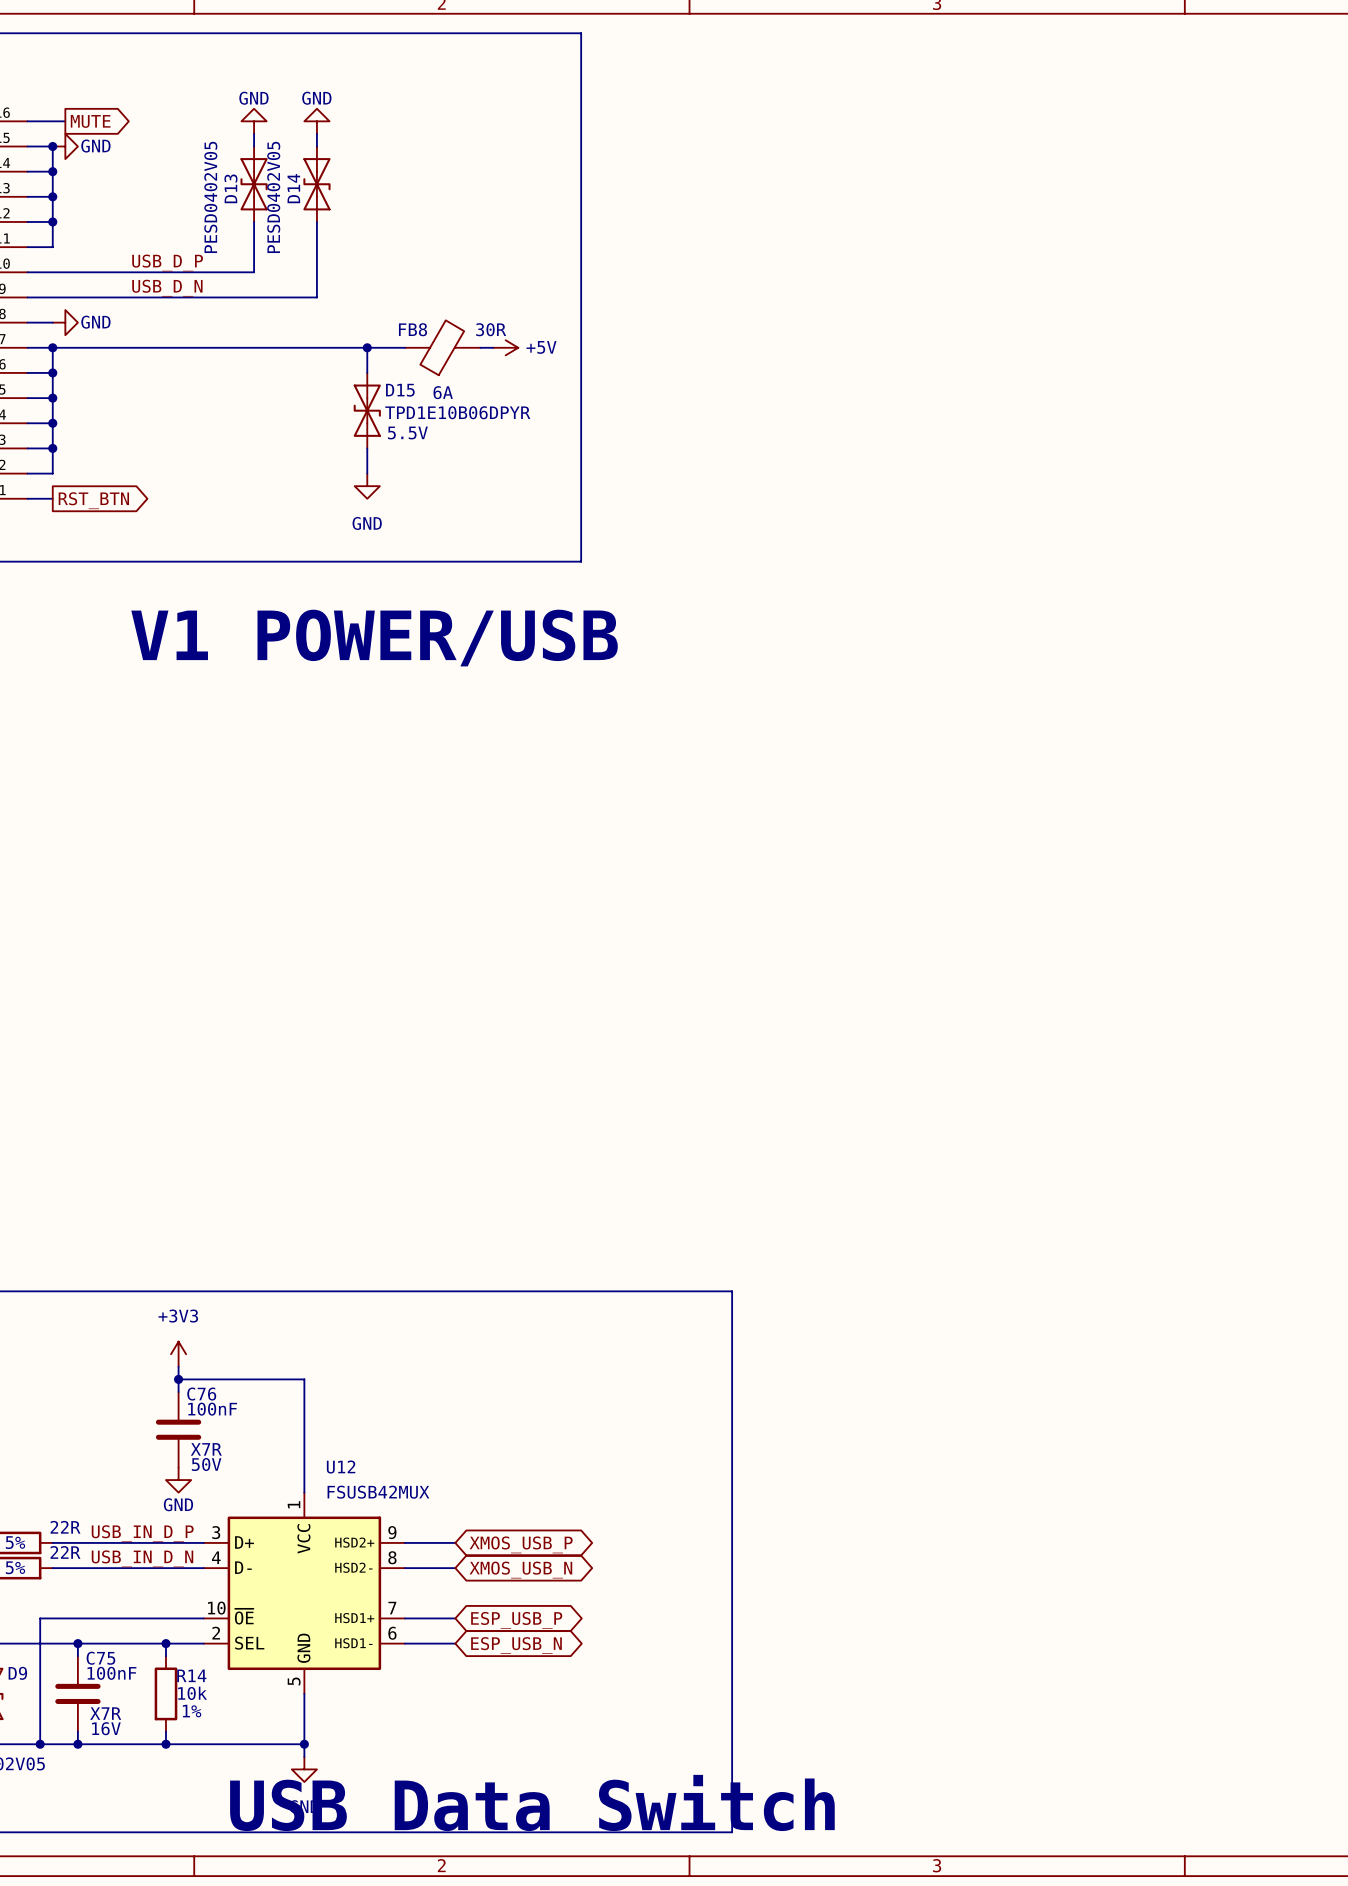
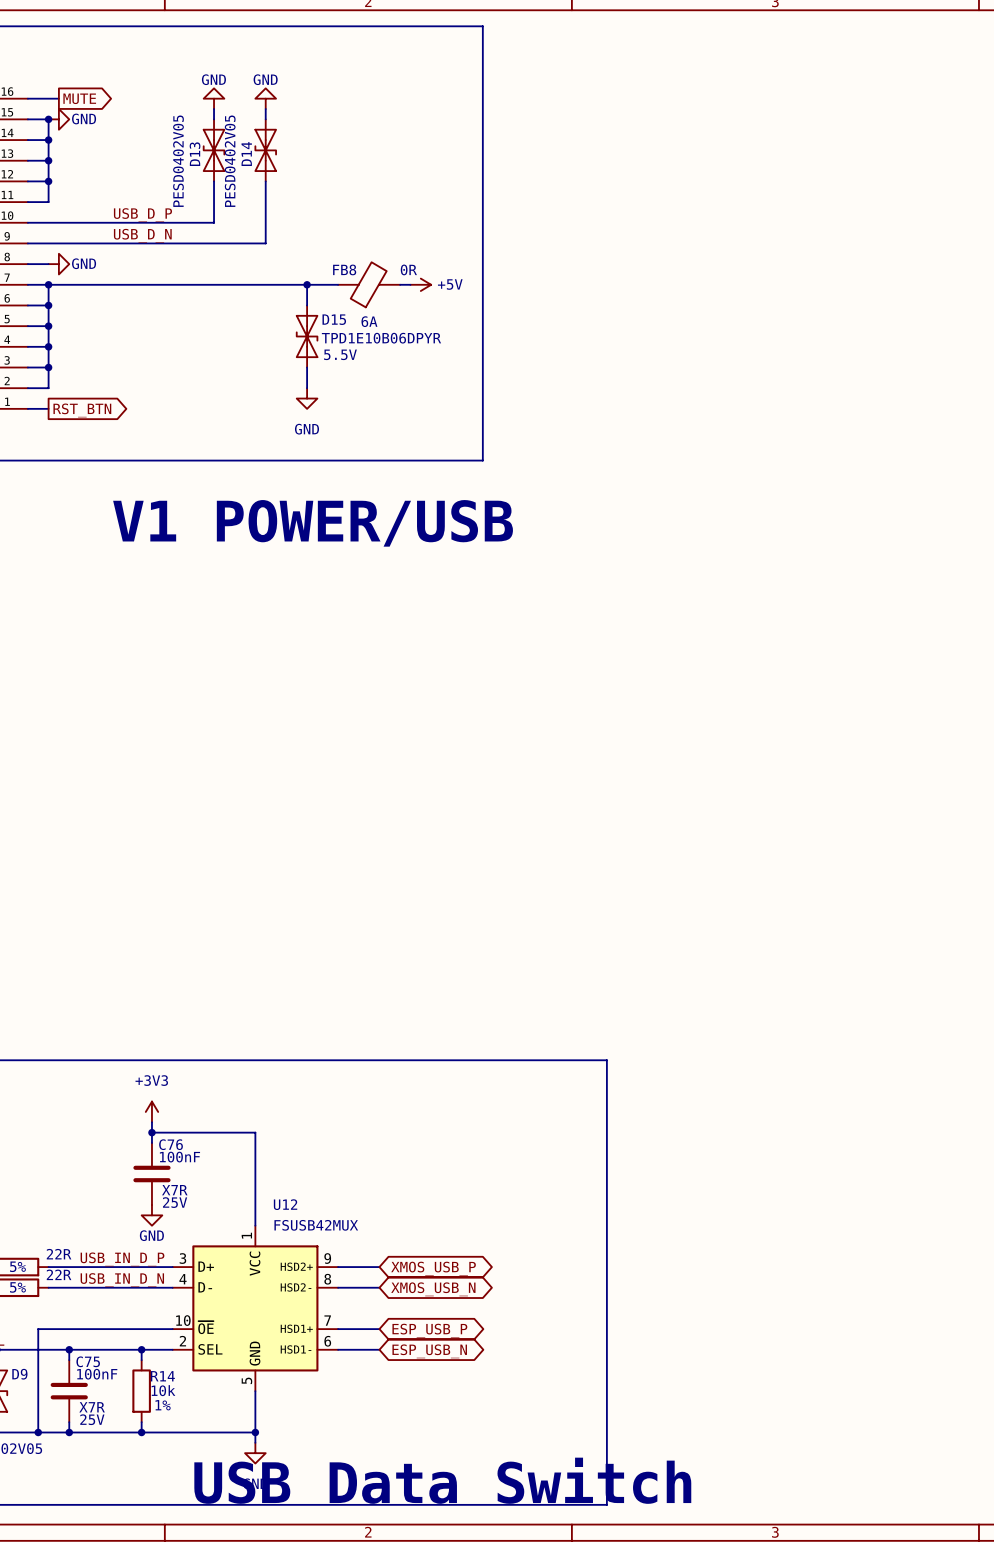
FB8 value: 30R (491, 329) -> 0R (408, 269)
C76 text: 50V (206, 1464) -> 25V (175, 1202)
C75 text: 16V (106, 1728) -> 25V (92, 1419)

